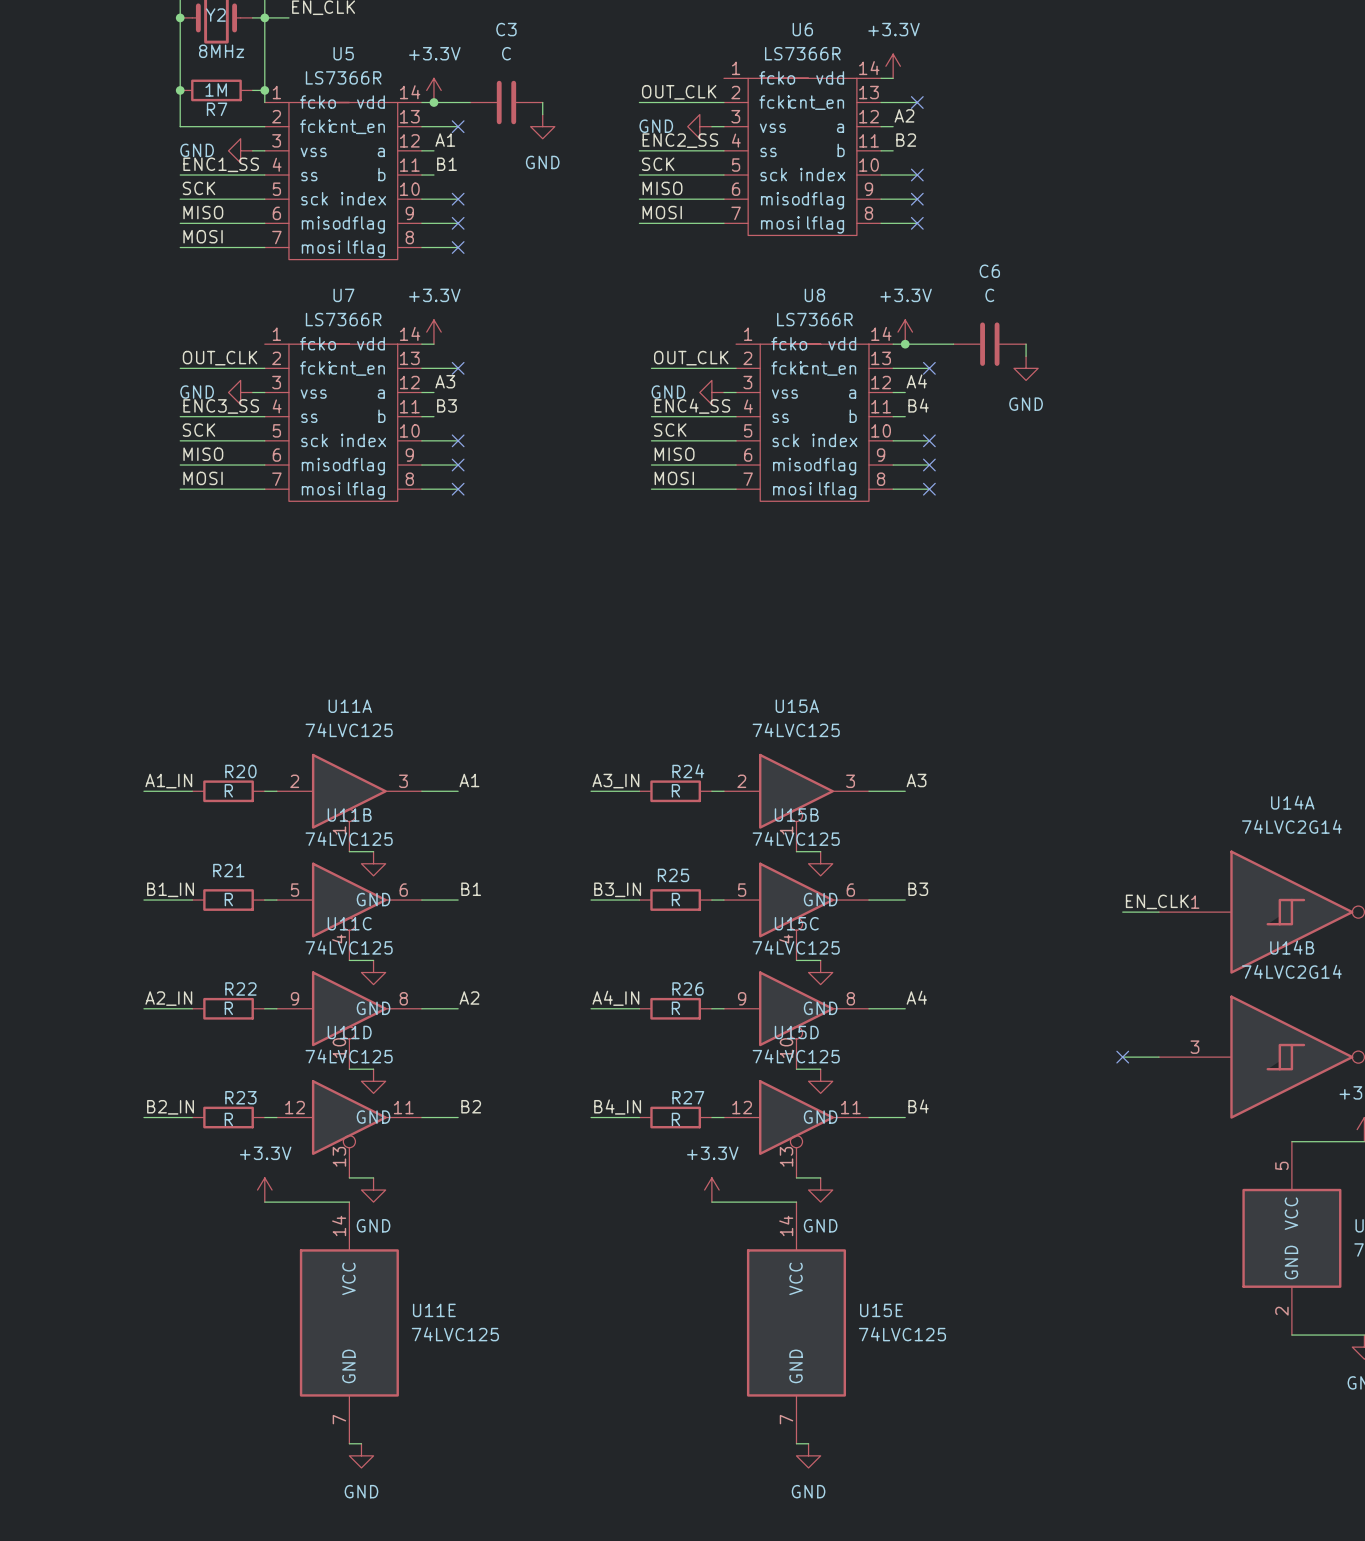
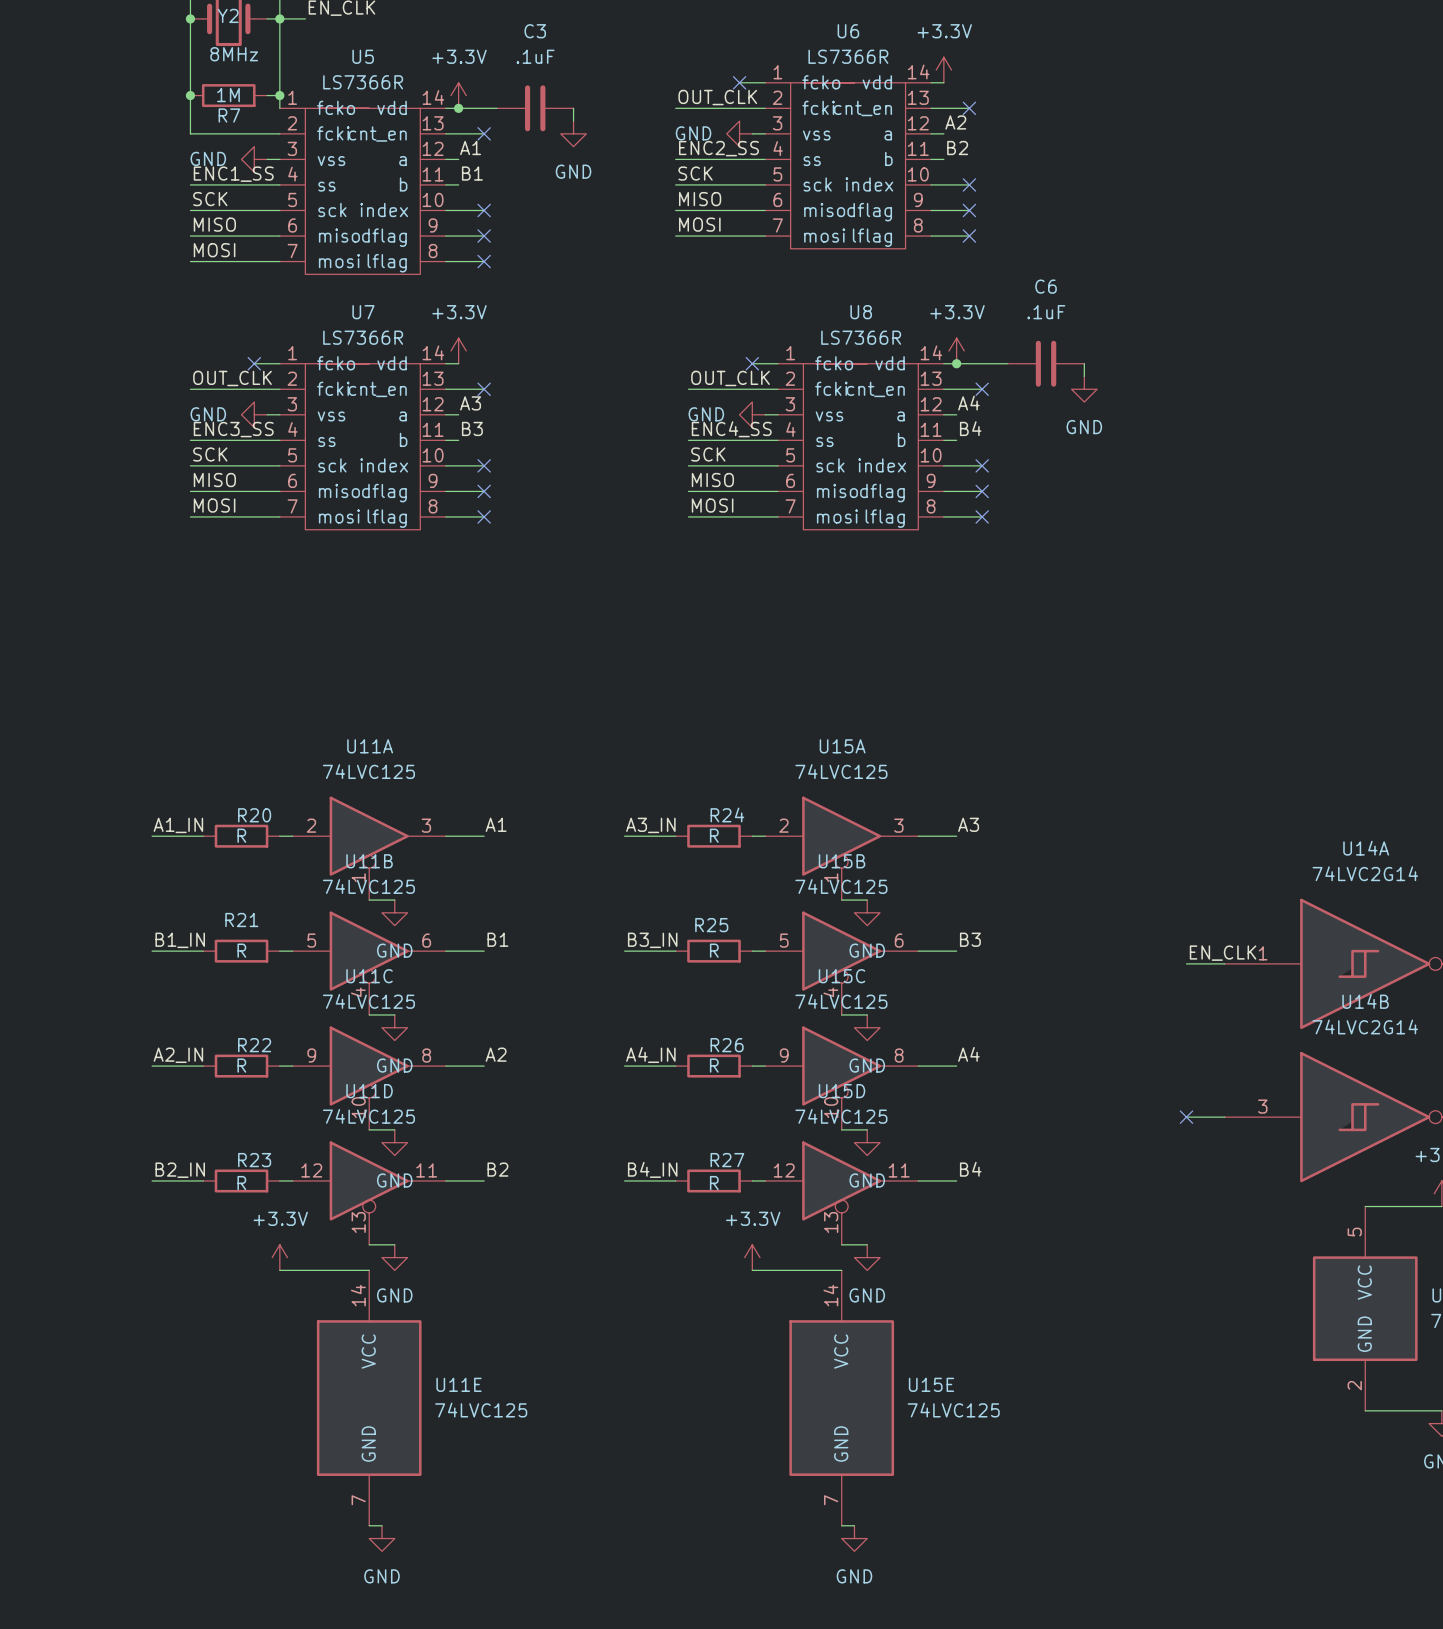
C3 value: C (506, 53) -> .1uF (535, 56)
wire: none -> (739, 82) (765, 82)
no-connect mark: none -> (739, 82)
C6 value: C (989, 295) -> .1uF (1046, 312)
wire: none -> (254, 363) (279, 363)
no-connect mark: none -> (254, 363)
wire: none -> (752, 363) (777, 363)
no-connect mark: none -> (752, 363)

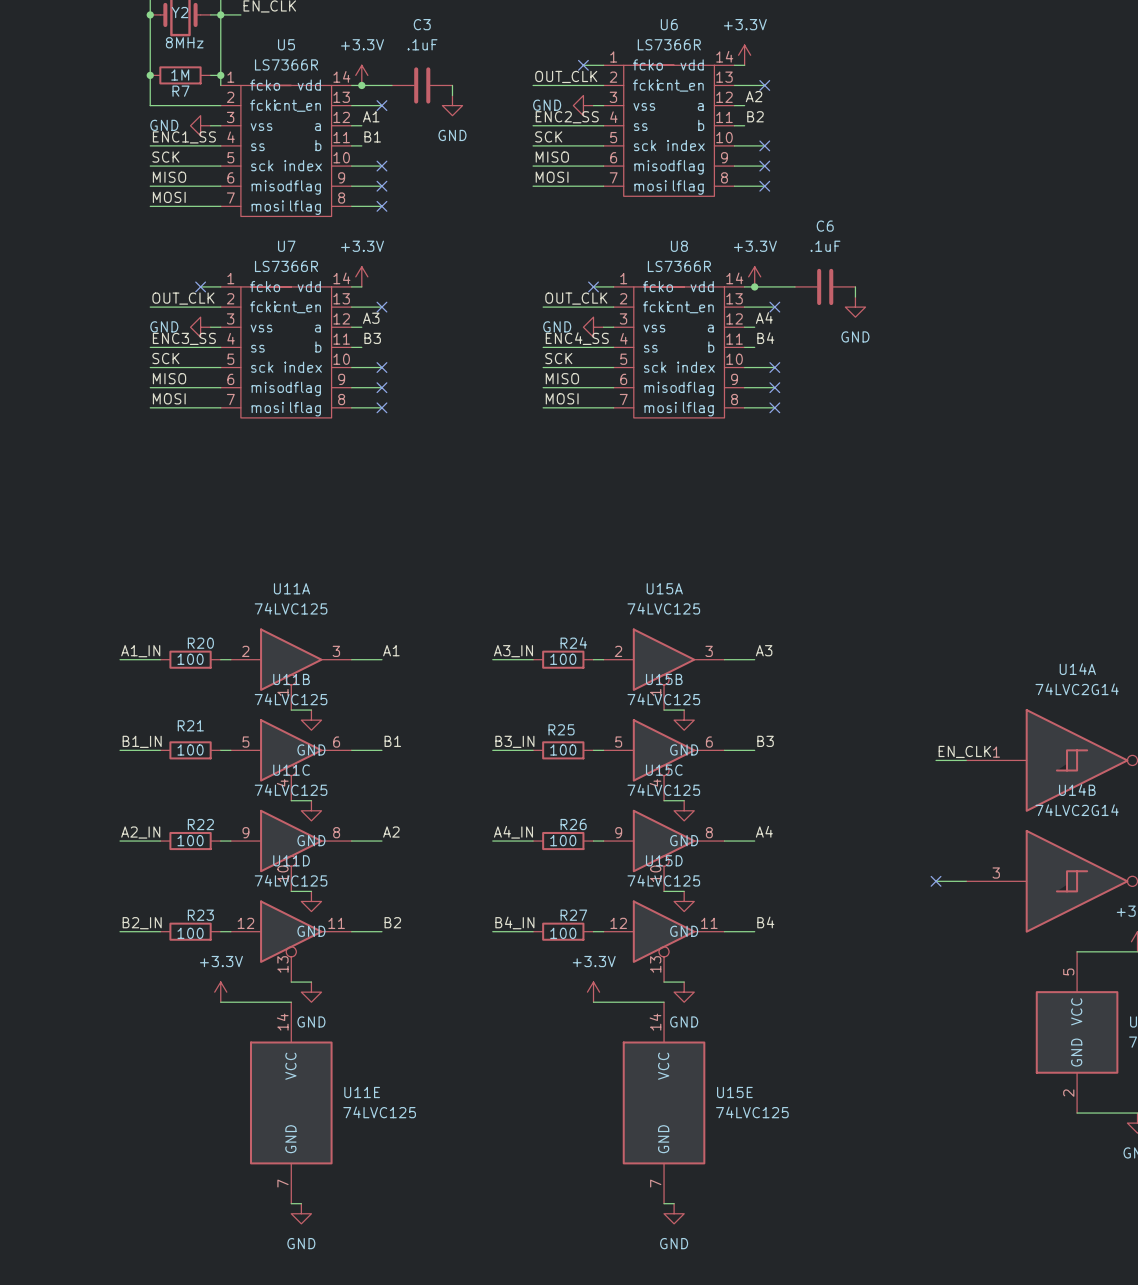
R20 value: R (241, 835) -> 100 (190, 659)
R24 value: R (714, 835) -> 100 (563, 659)
R21 value: R (241, 950) -> 100 (190, 749)
R25 value: R (714, 950) -> 100 (563, 749)
R22 value: R (241, 1065) -> 100 (190, 840)
R26 value: R (714, 1065) -> 100 (563, 840)
R23 value: R (241, 1183) -> 100 (190, 933)
R27 value: R (714, 1183) -> 100 (563, 933)

